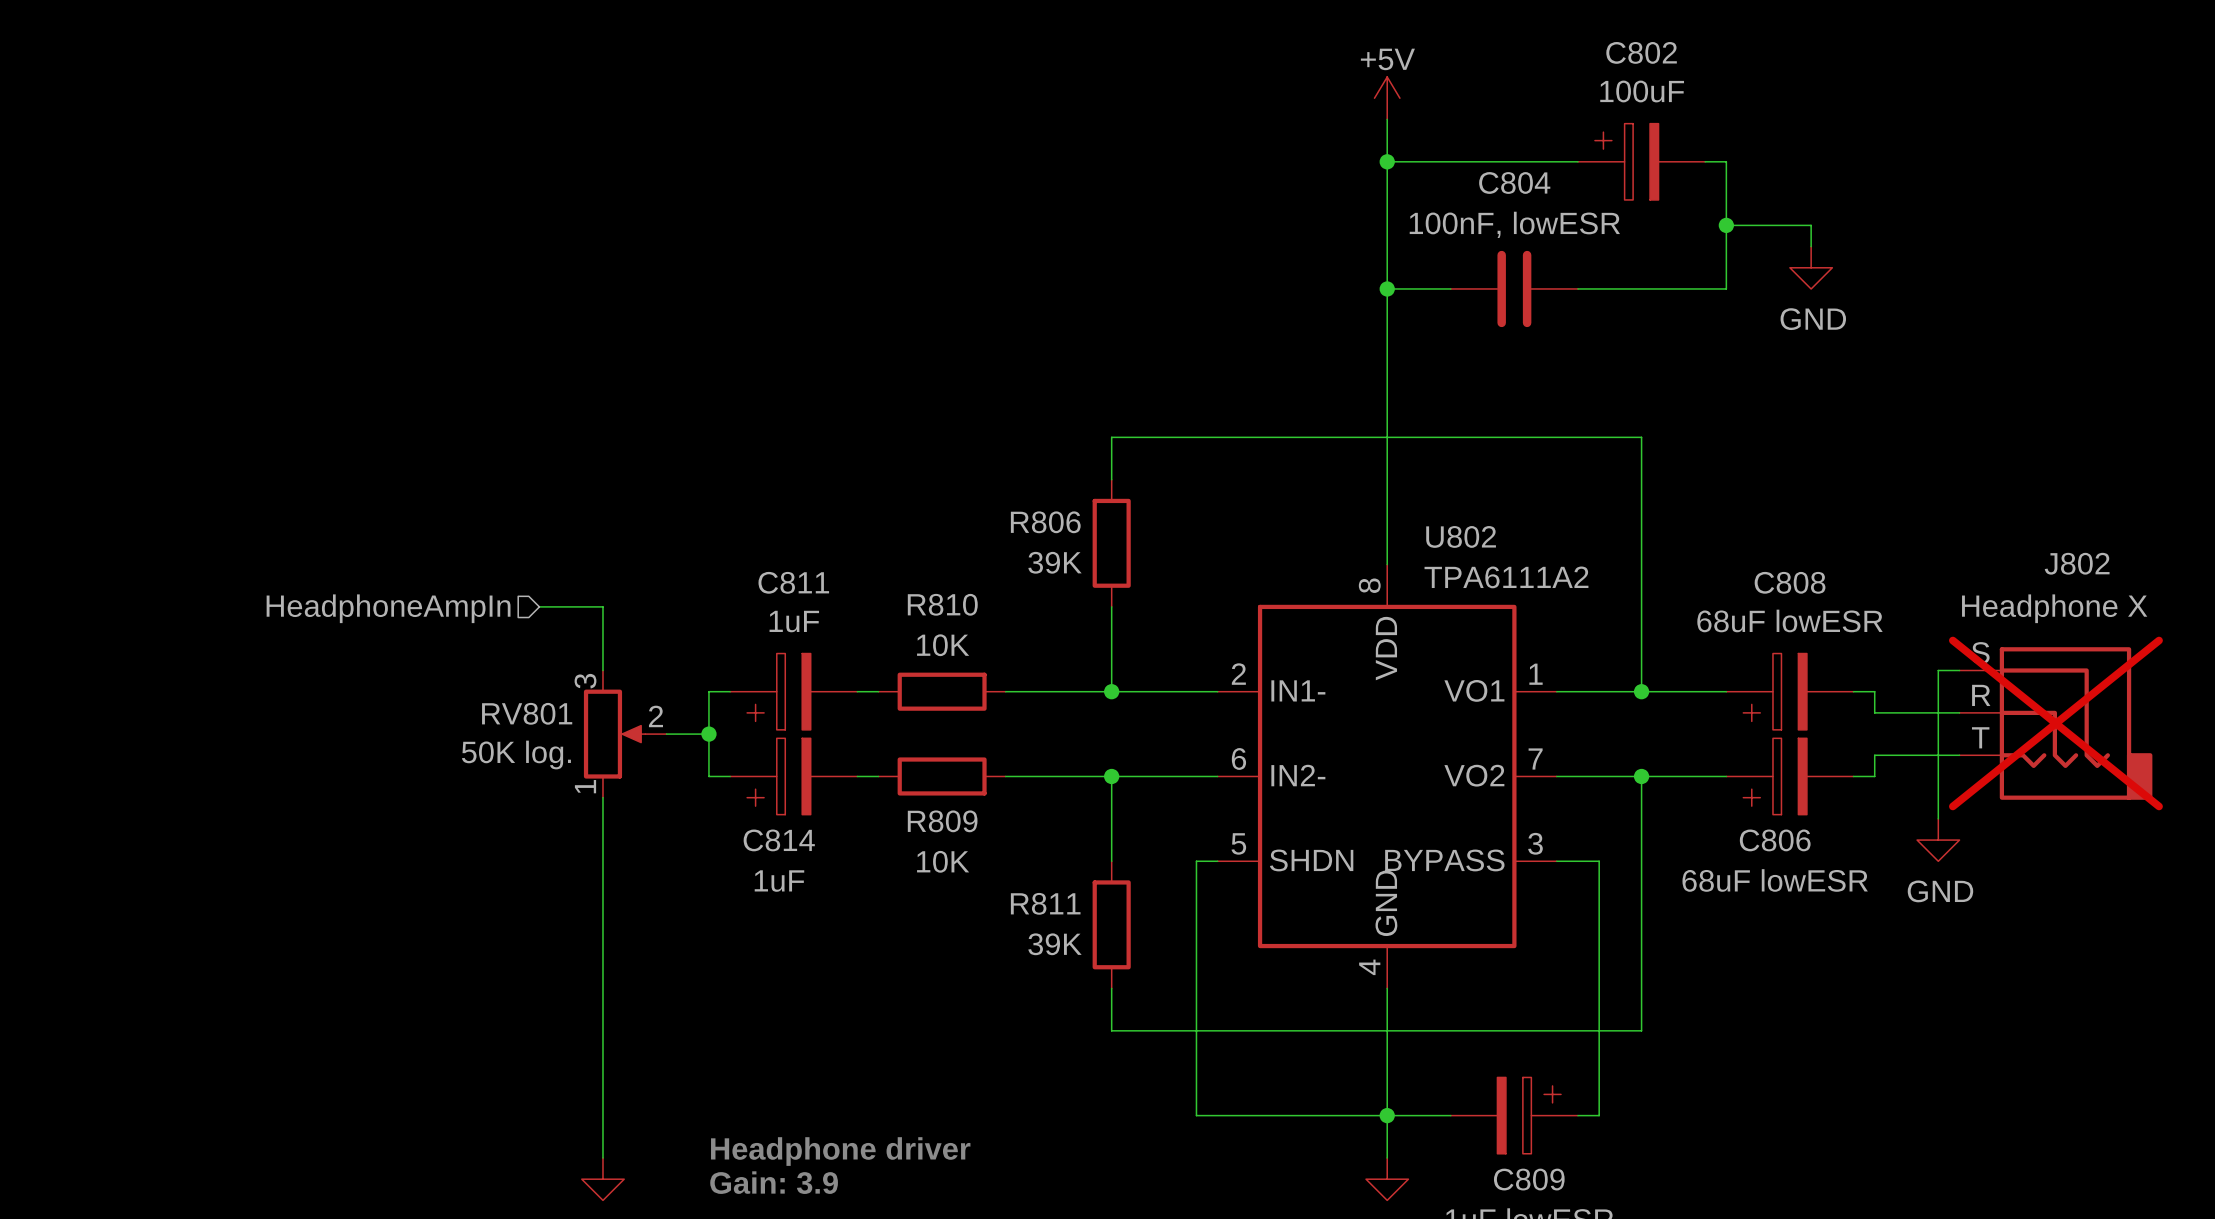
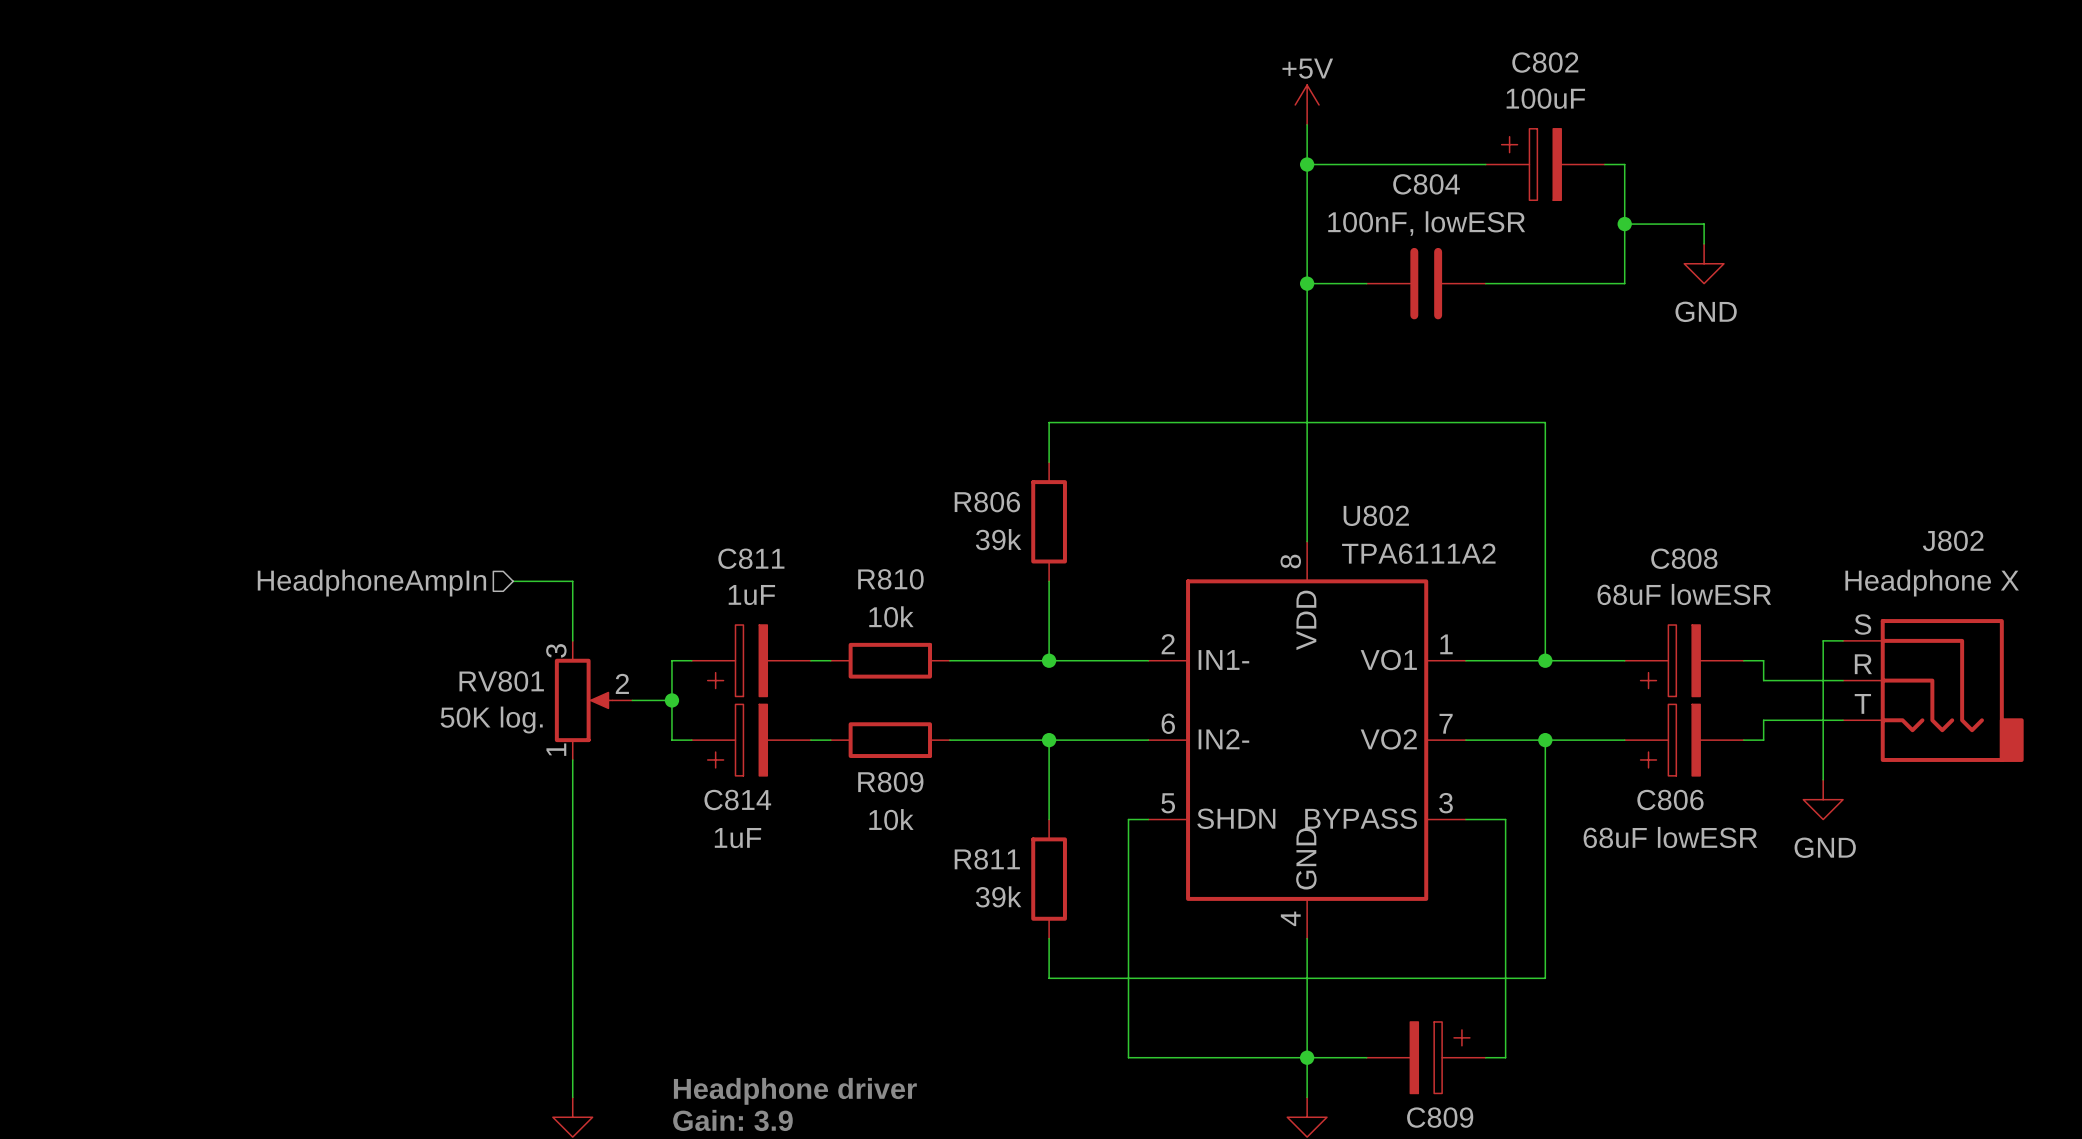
R806 value: 39K (1055, 562) -> 39k (998, 539)
R810 value: 10K (943, 645) -> 10k (891, 616)
J802 do-not-place cross: (2055, 723) -> none
R809 value: 10K (943, 861) -> 10k (891, 819)
R811 value: 39K (1055, 944) -> 39k (998, 896)

